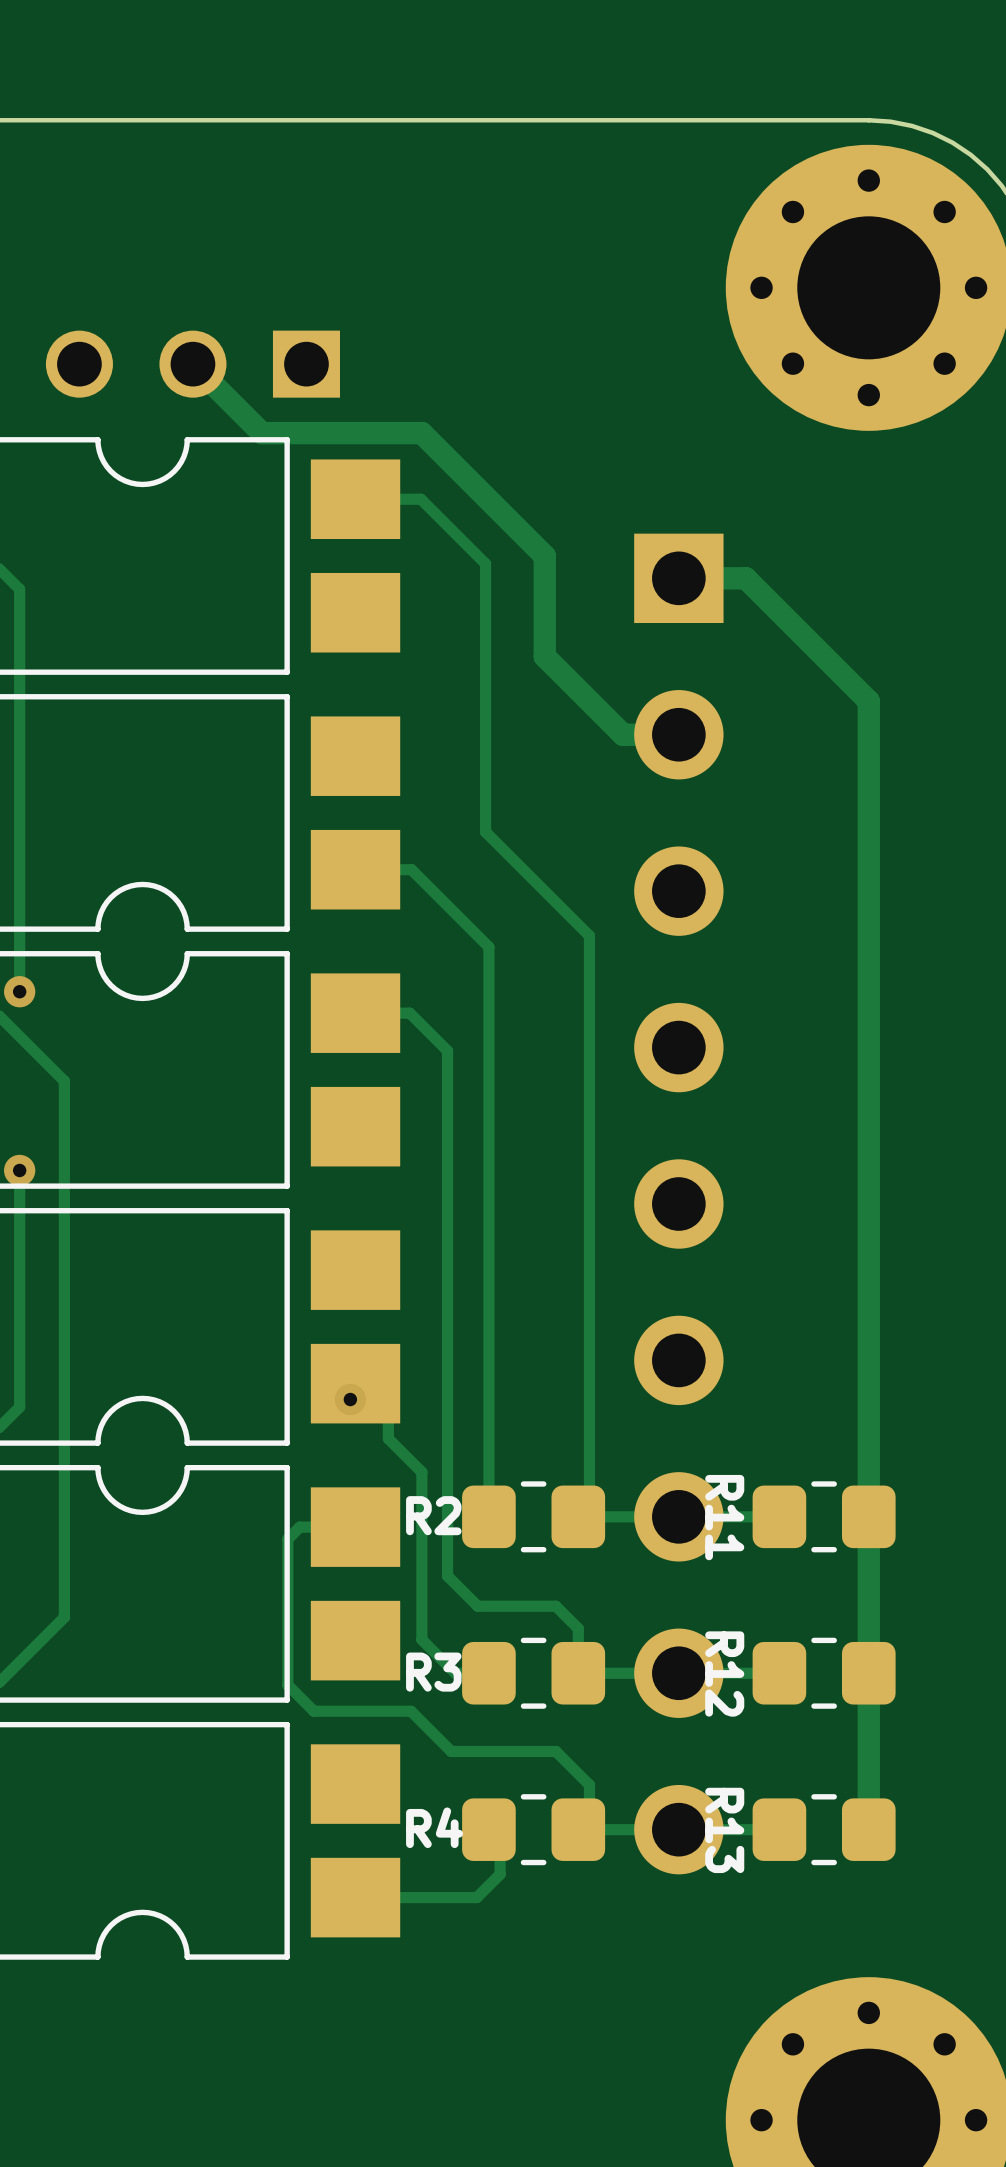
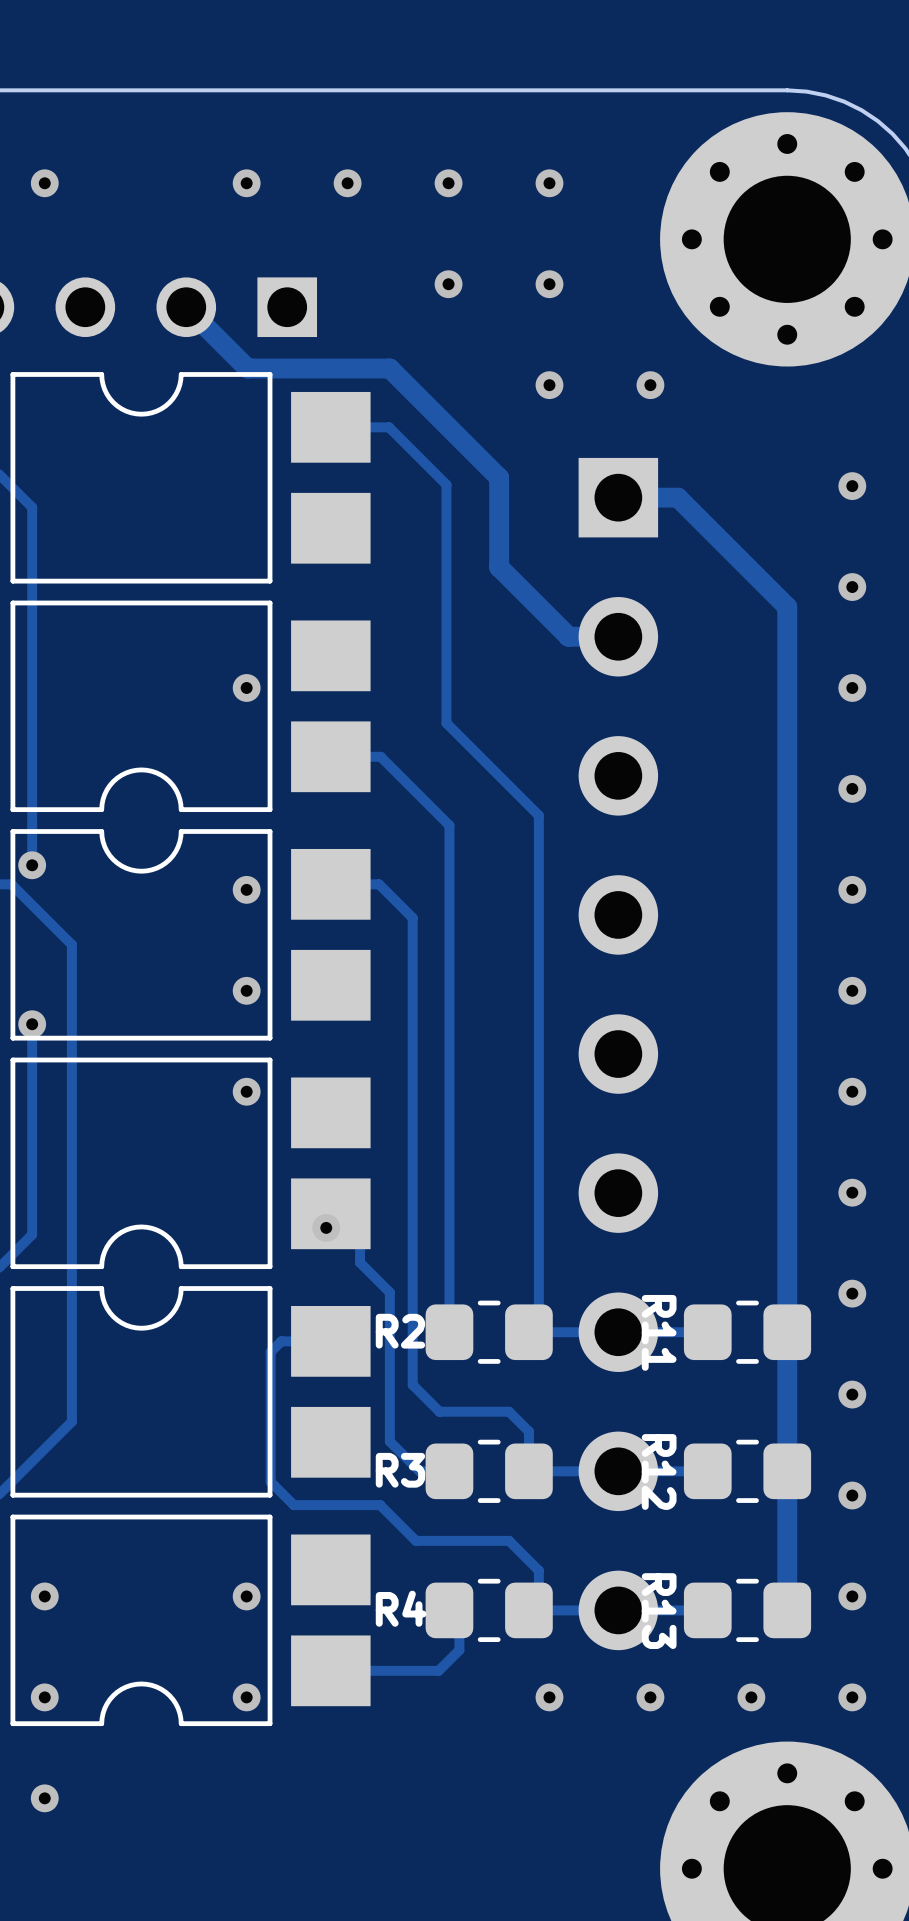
via: none -> (44, 183)
via: none -> (246, 183)
via: none -> (347, 183)
via: none -> (448, 183)
via: none -> (549, 183)
via: none -> (448, 284)
via: none -> (549, 284)
via: none -> (549, 385)
via: none -> (650, 385)
via: none -> (852, 486)
via: none -> (852, 587)
via: none -> (246, 687)
via: none -> (852, 687)
via: none -> (852, 788)
via: none -> (246, 889)
via: none -> (852, 889)
via: none -> (246, 990)
via: none -> (852, 990)
via: none -> (246, 1091)
via: none -> (852, 1091)
via: none -> (852, 1192)
via: none -> (852, 1293)
via: none -> (852, 1394)
via: none -> (852, 1495)
via: none -> (44, 1596)
via: none -> (246, 1596)
via: none -> (852, 1596)
via: none -> (44, 1697)
via: none -> (246, 1697)
via: none -> (549, 1697)
via: none -> (650, 1697)
via: none -> (751, 1697)
via: none -> (852, 1697)
via: none -> (44, 1798)

